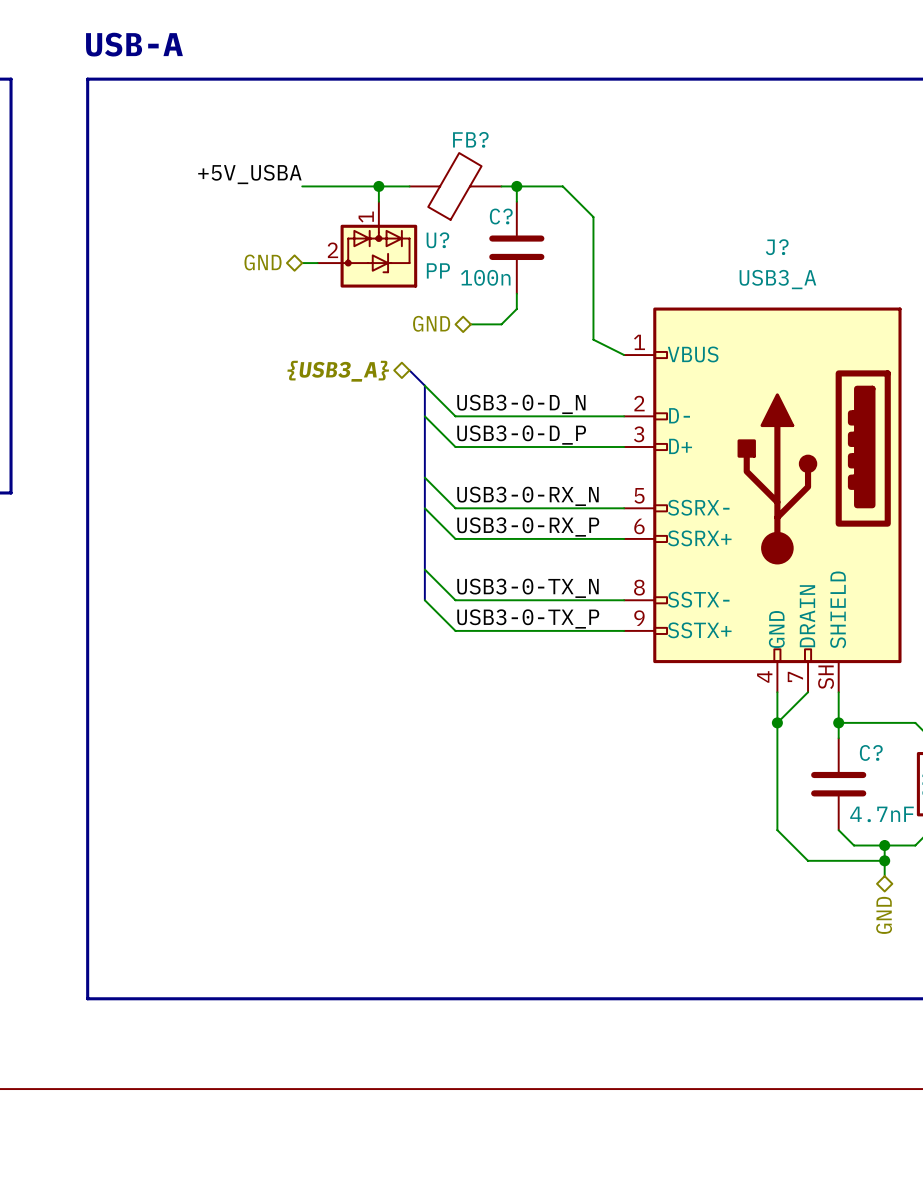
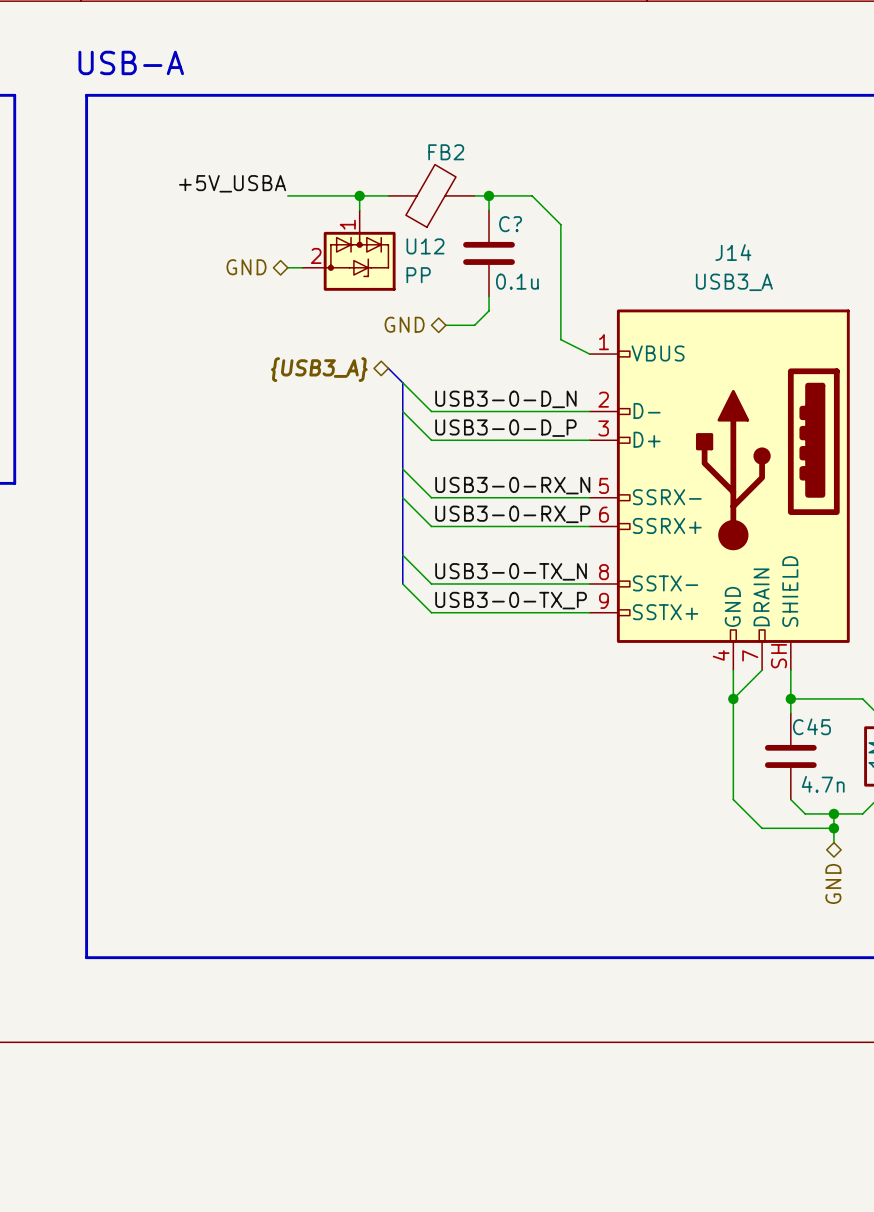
FB? name: FB? (470, 139) -> FB2 (446, 152)
C? name position: C? (501, 216) -> C? (510, 224)
U? name: U? (437, 240) -> U12 (425, 246)
J? name: J? (777, 247) -> J14 (733, 252)
C? value: 100n (485, 277) -> 0.1u (517, 281)
C? name: C? (871, 752) -> C45 (811, 726)
C? value: 4.7nF (882, 814) -> 4.7n (823, 784)

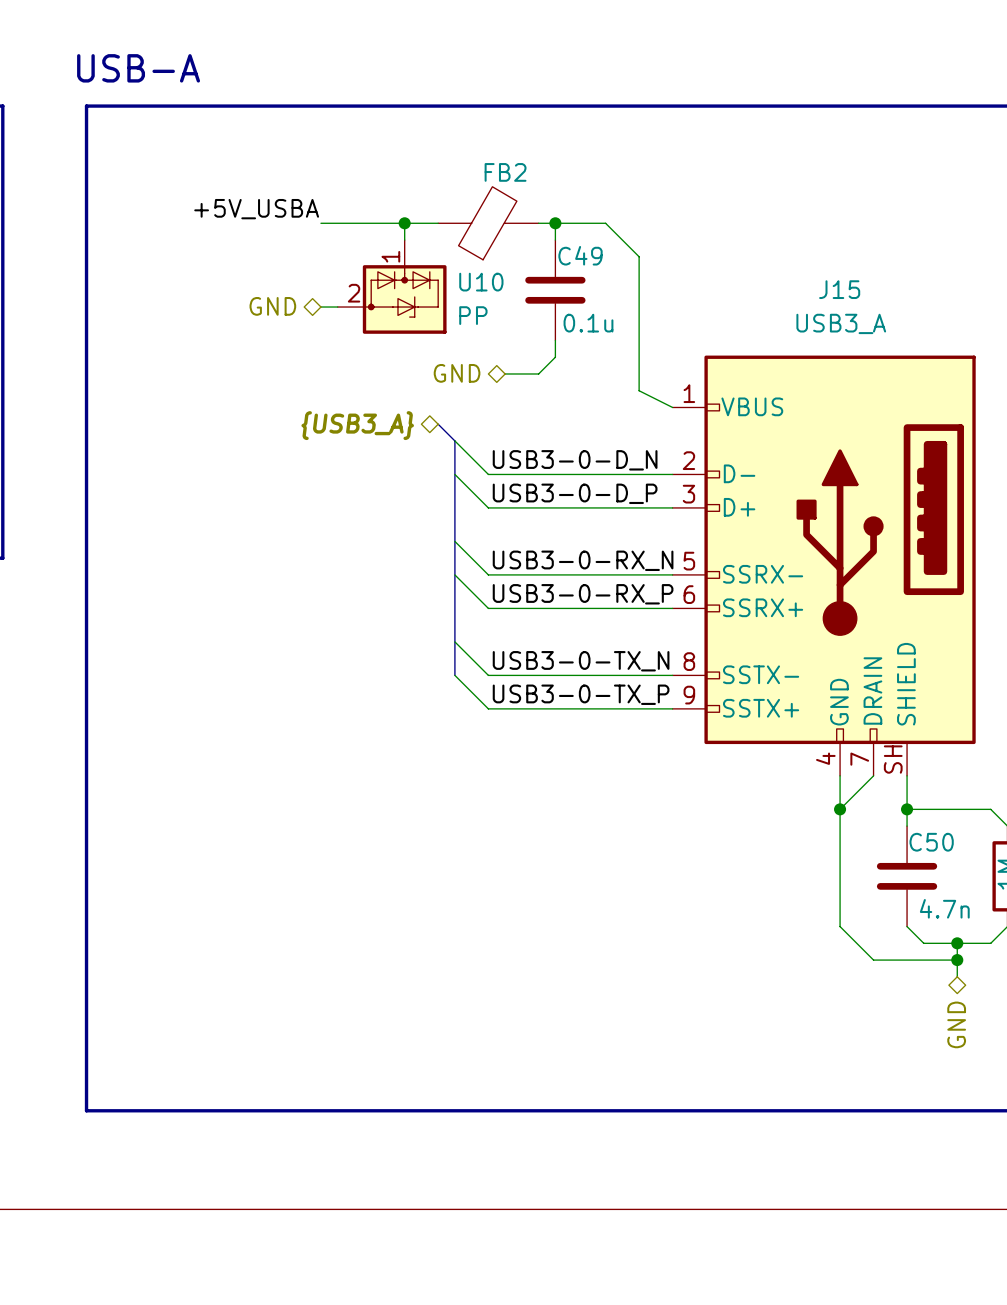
C? name: C? (510, 224) -> C49 (580, 255)
U12 name: U12 (425, 246) -> U10 (481, 282)
J14 name: J14 (733, 252) -> J15 (839, 289)
C45 name: C45 (811, 726) -> C50 (931, 842)

